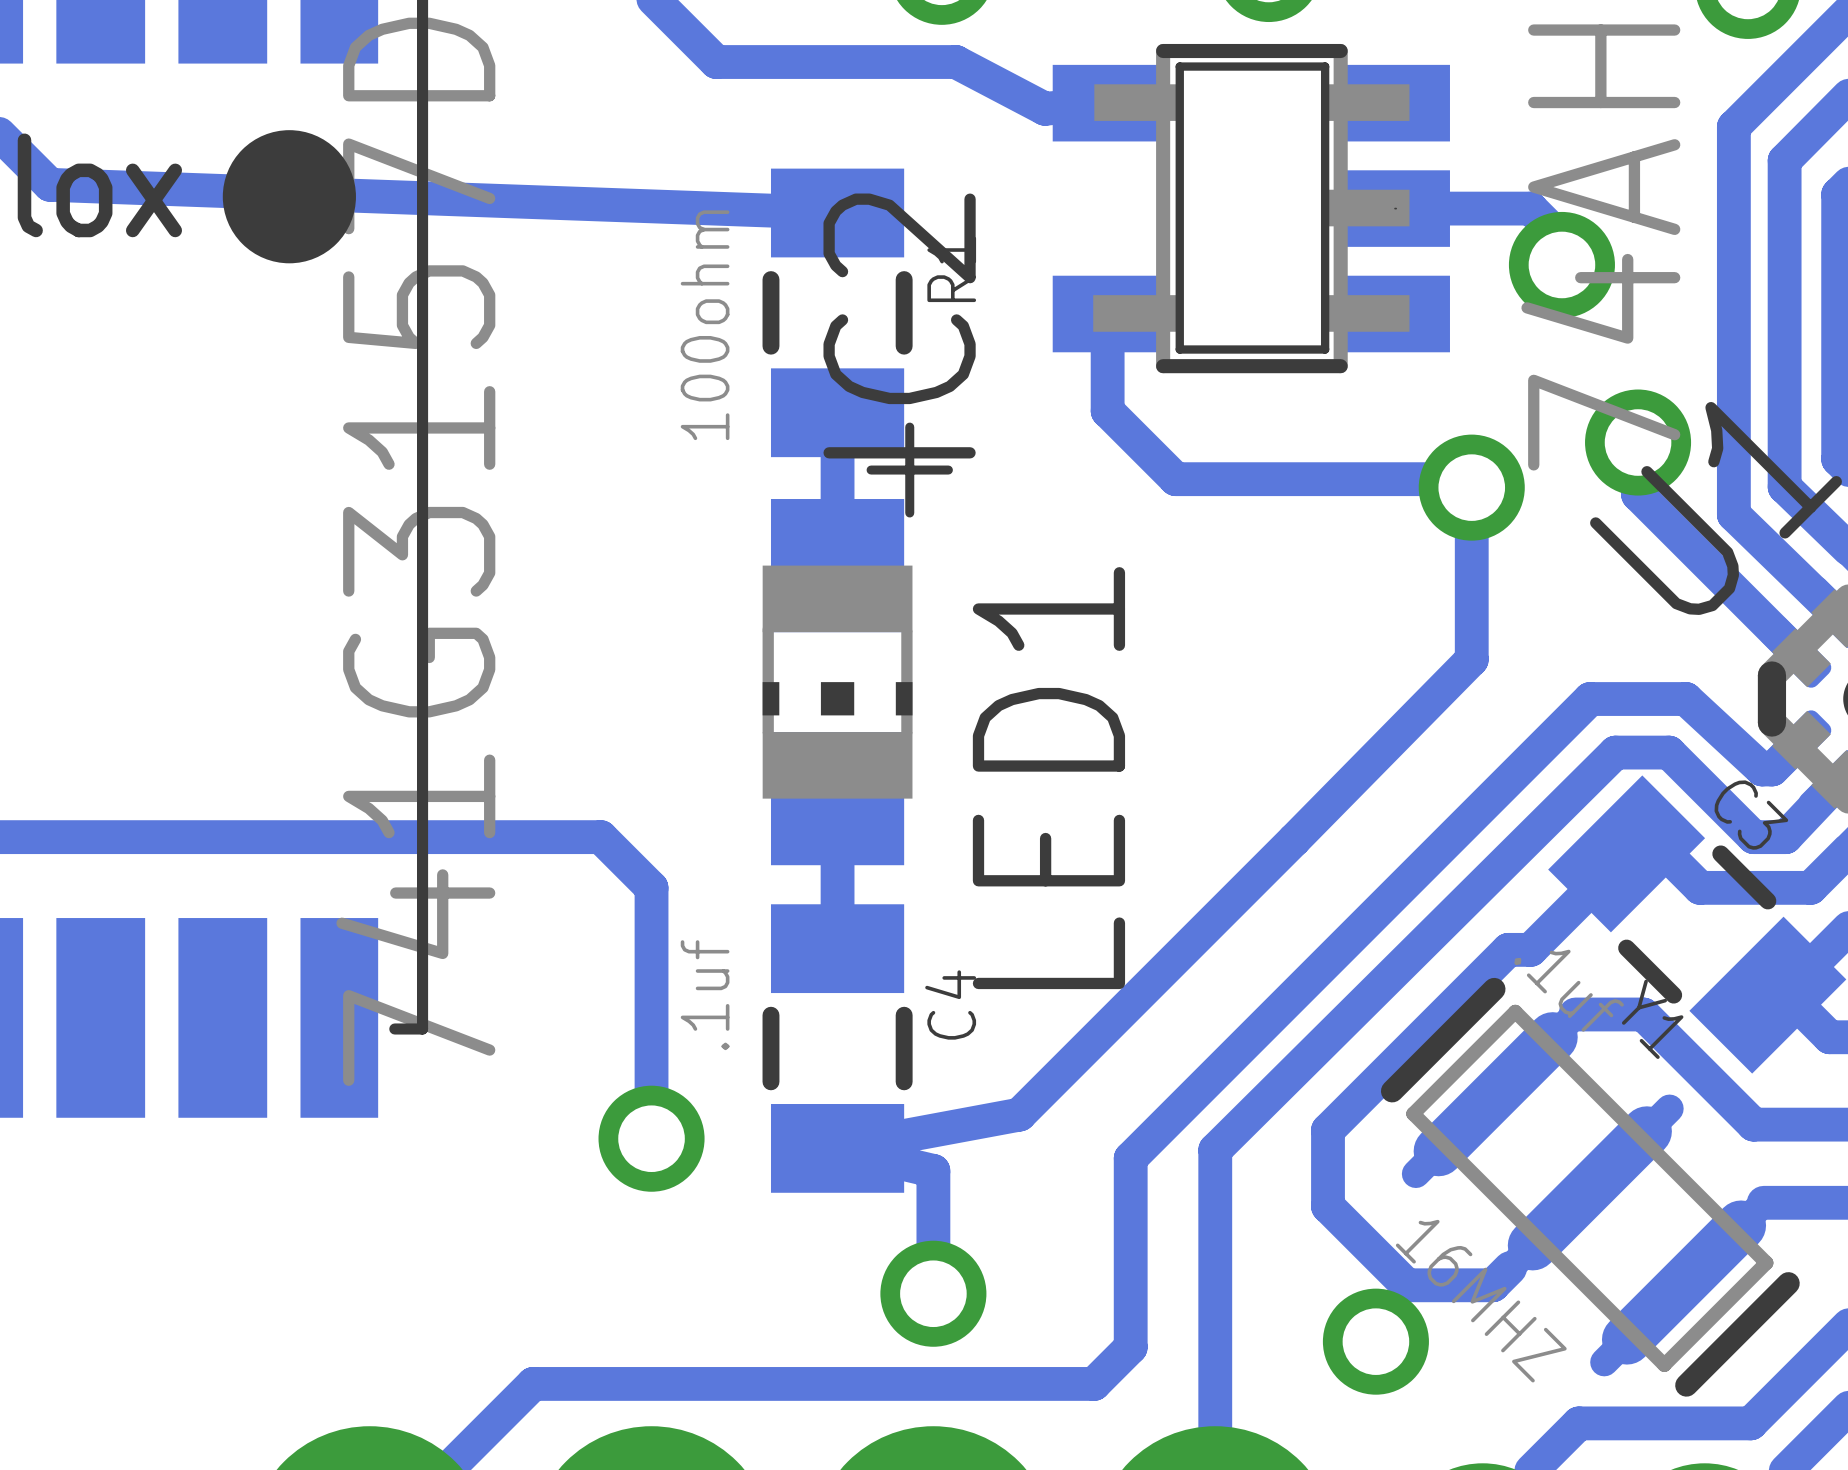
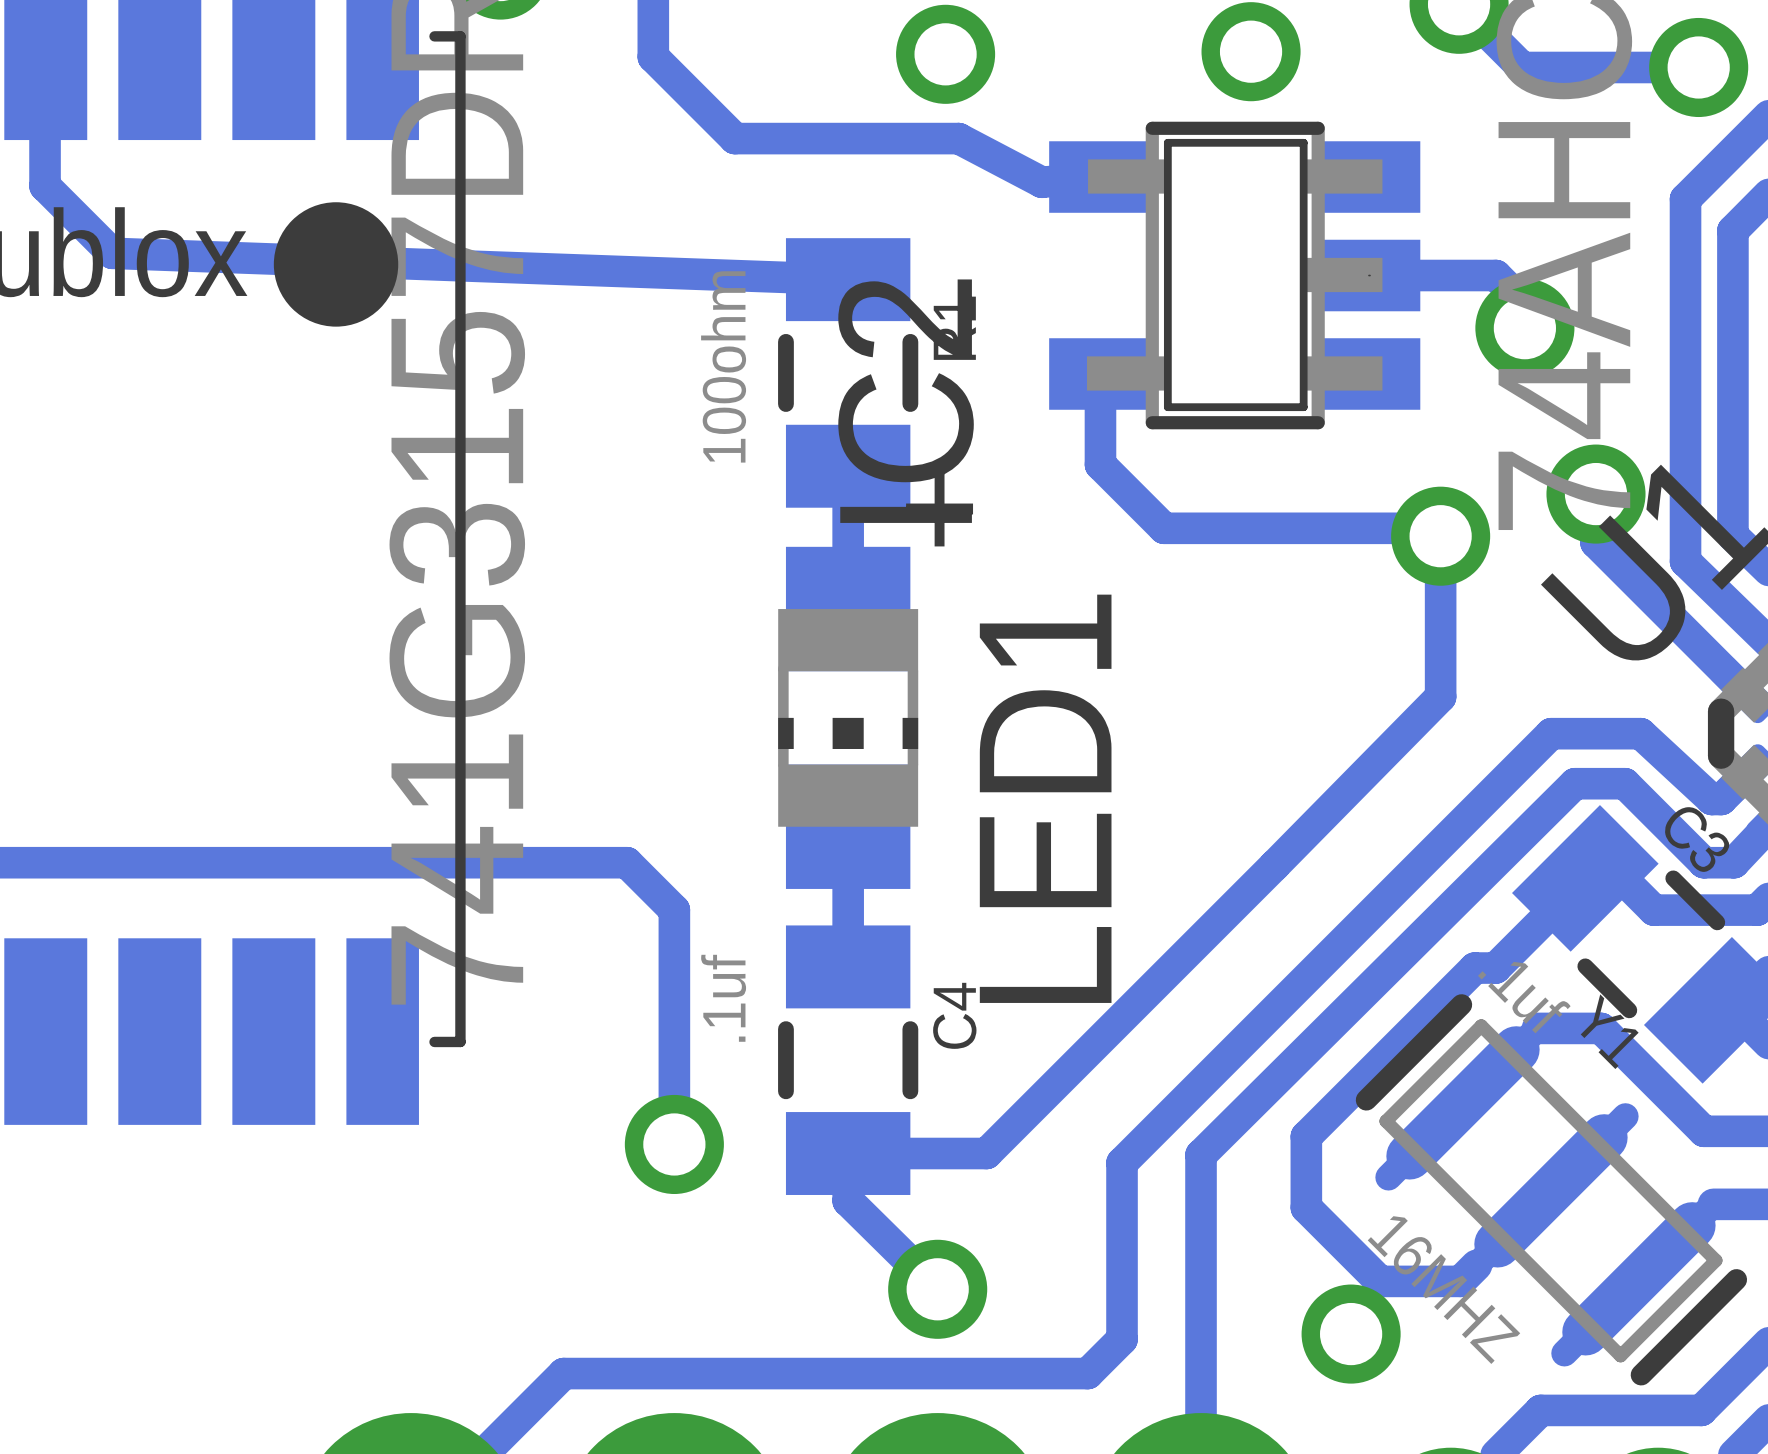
track: (1019, 1114) (837, 1148) (933, 1170) (933, 1293) -> (1018, 1121) (986, 1153) (848, 1153) (848, 1200) (937, 1289)

